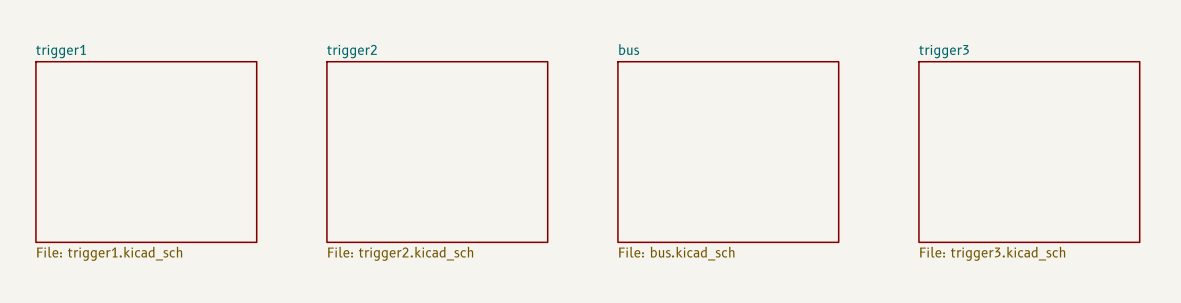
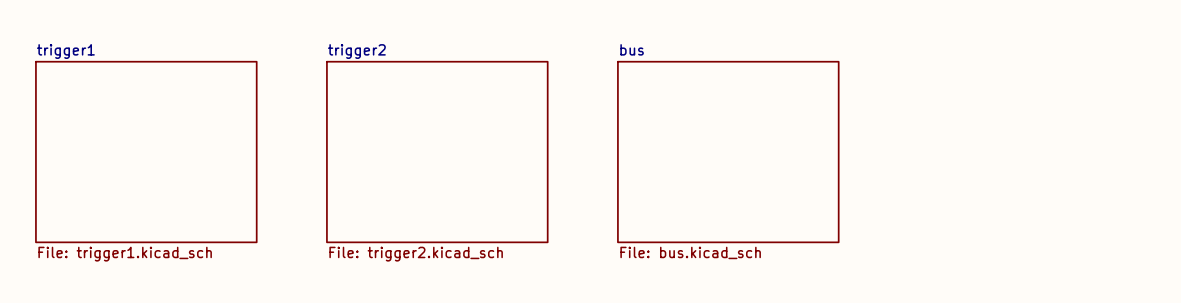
sheet trigger3: File: trigger3.kicad_sch (1029, 152) -> none

